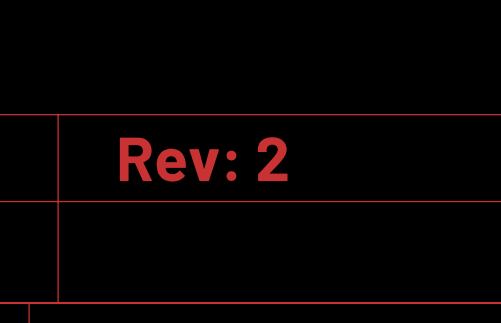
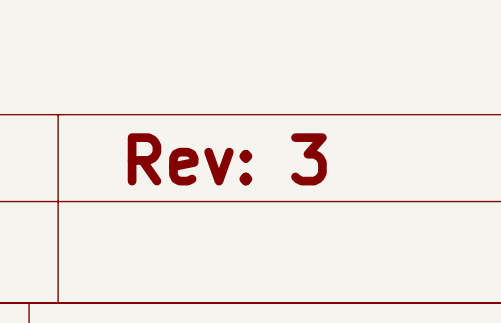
title block: Rev: 2 (203, 159) -> Rev: 3 (227, 159)

